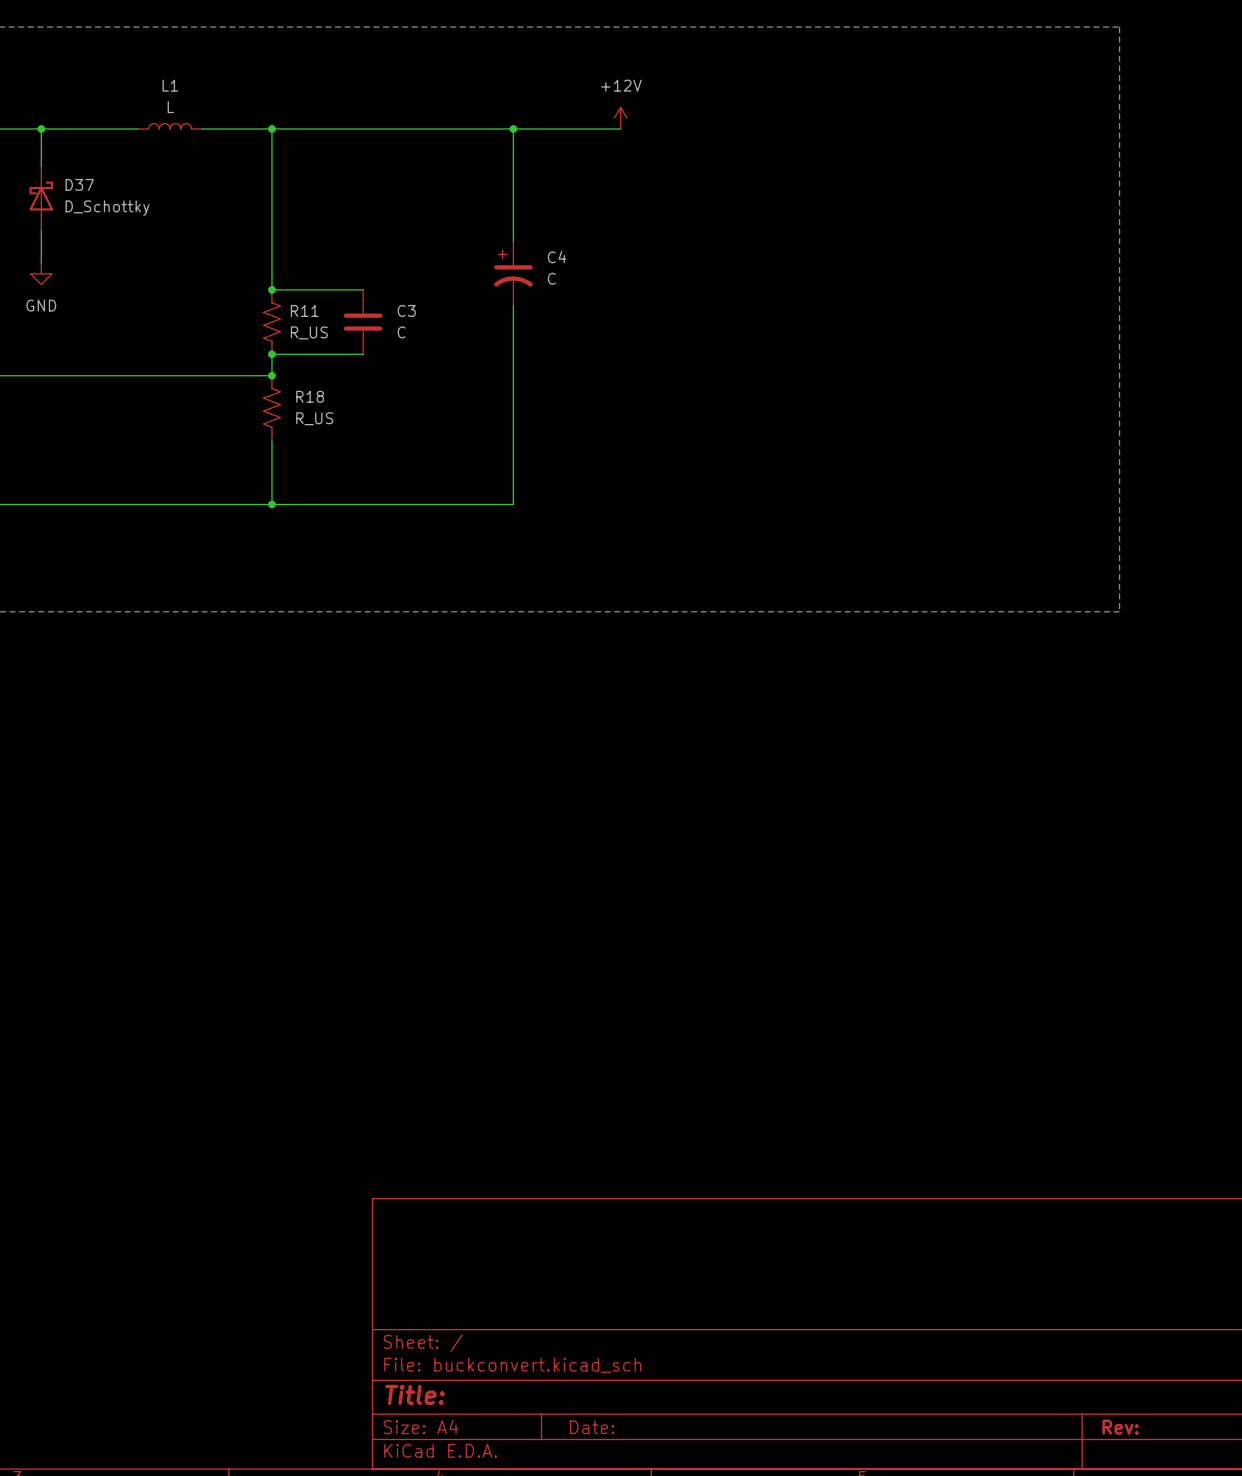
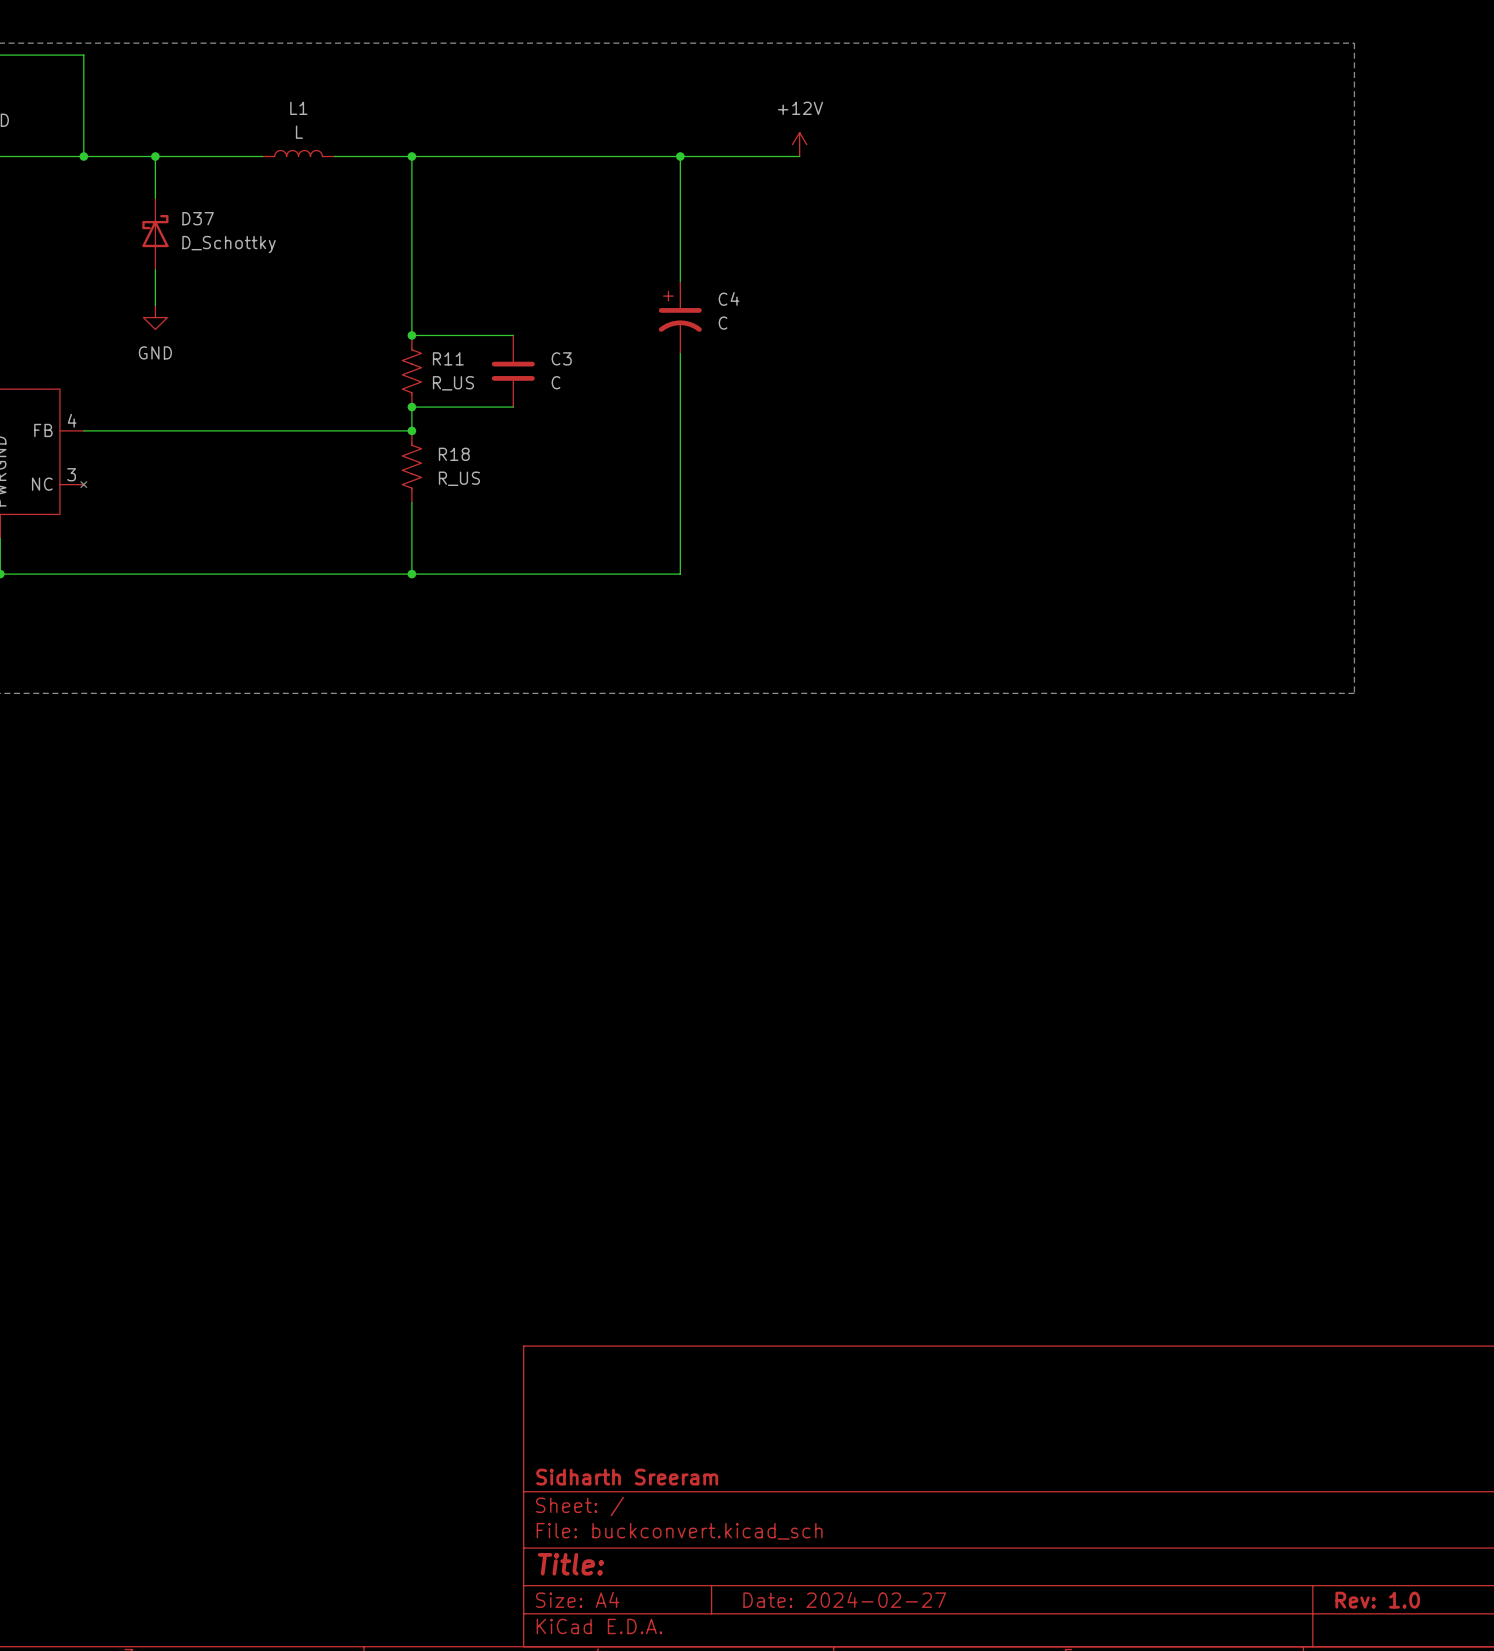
title block: none -> Sidharth Sreeram (627, 1477)
title block: Date: (592, 1427) -> Date: 2024-02-27 (844, 1599)
title block: Rev: (1120, 1427) -> Rev: 1.0 (1377, 1600)

